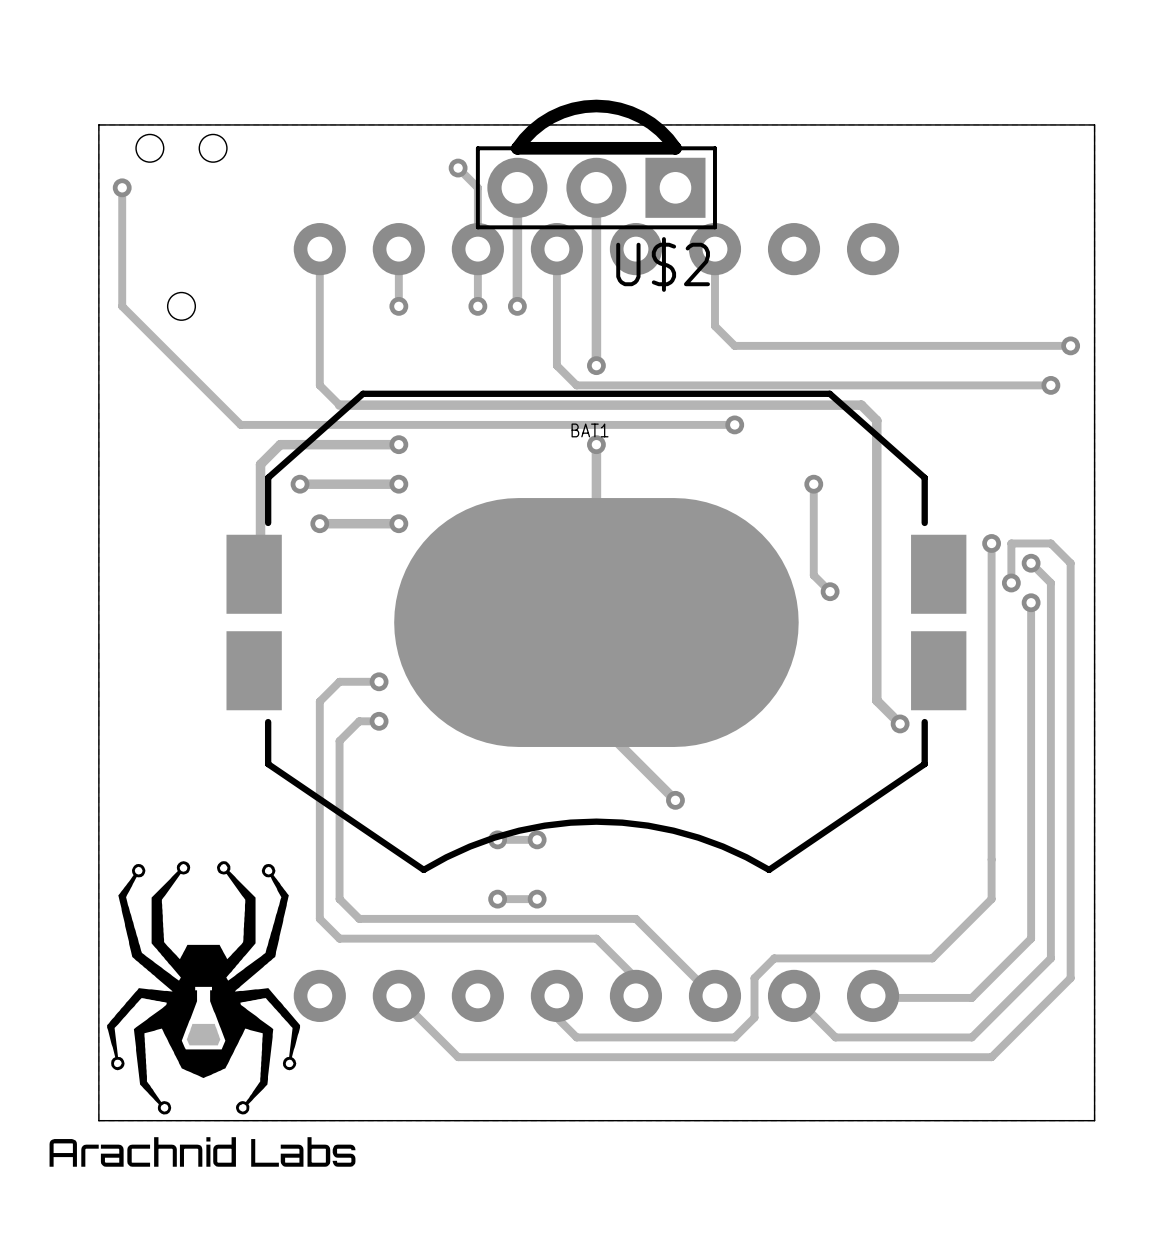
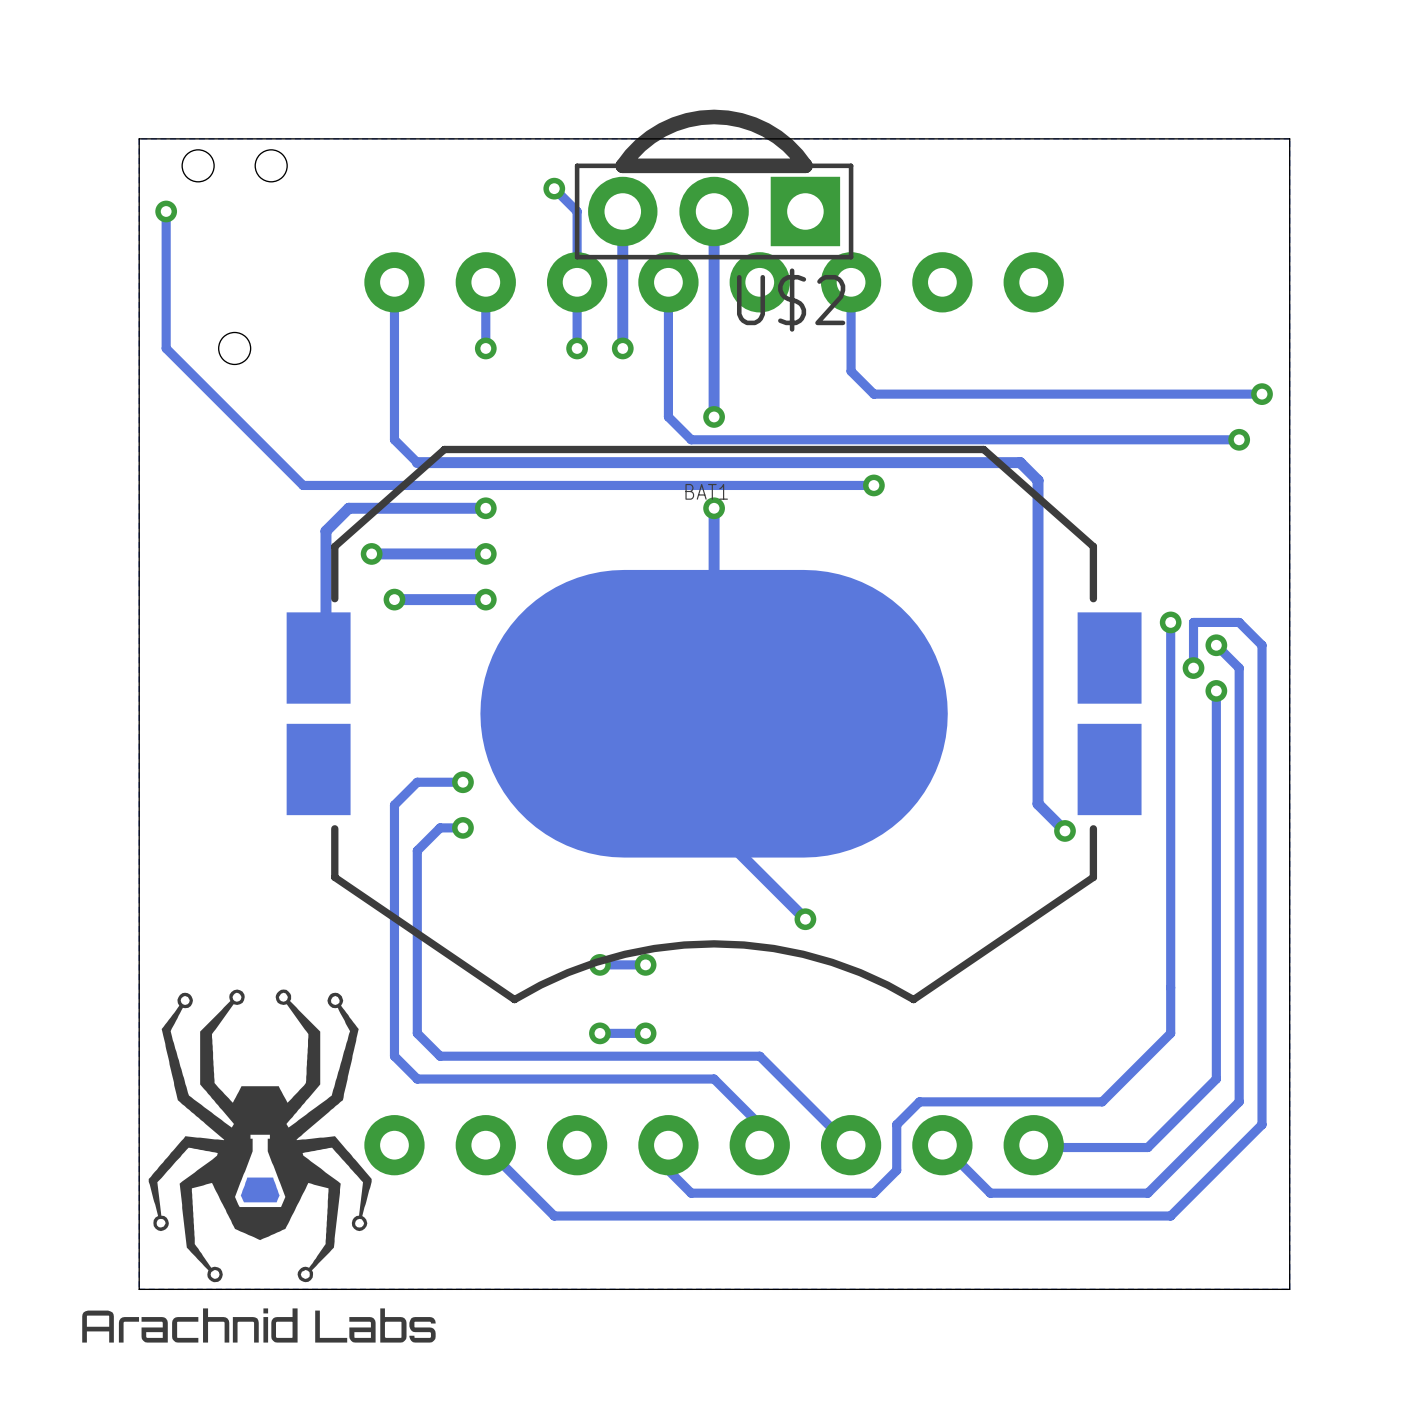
track: (813, 484) (813, 575) (830, 591) -> none
via: (813, 484) -> none
via: (830, 591) -> none

